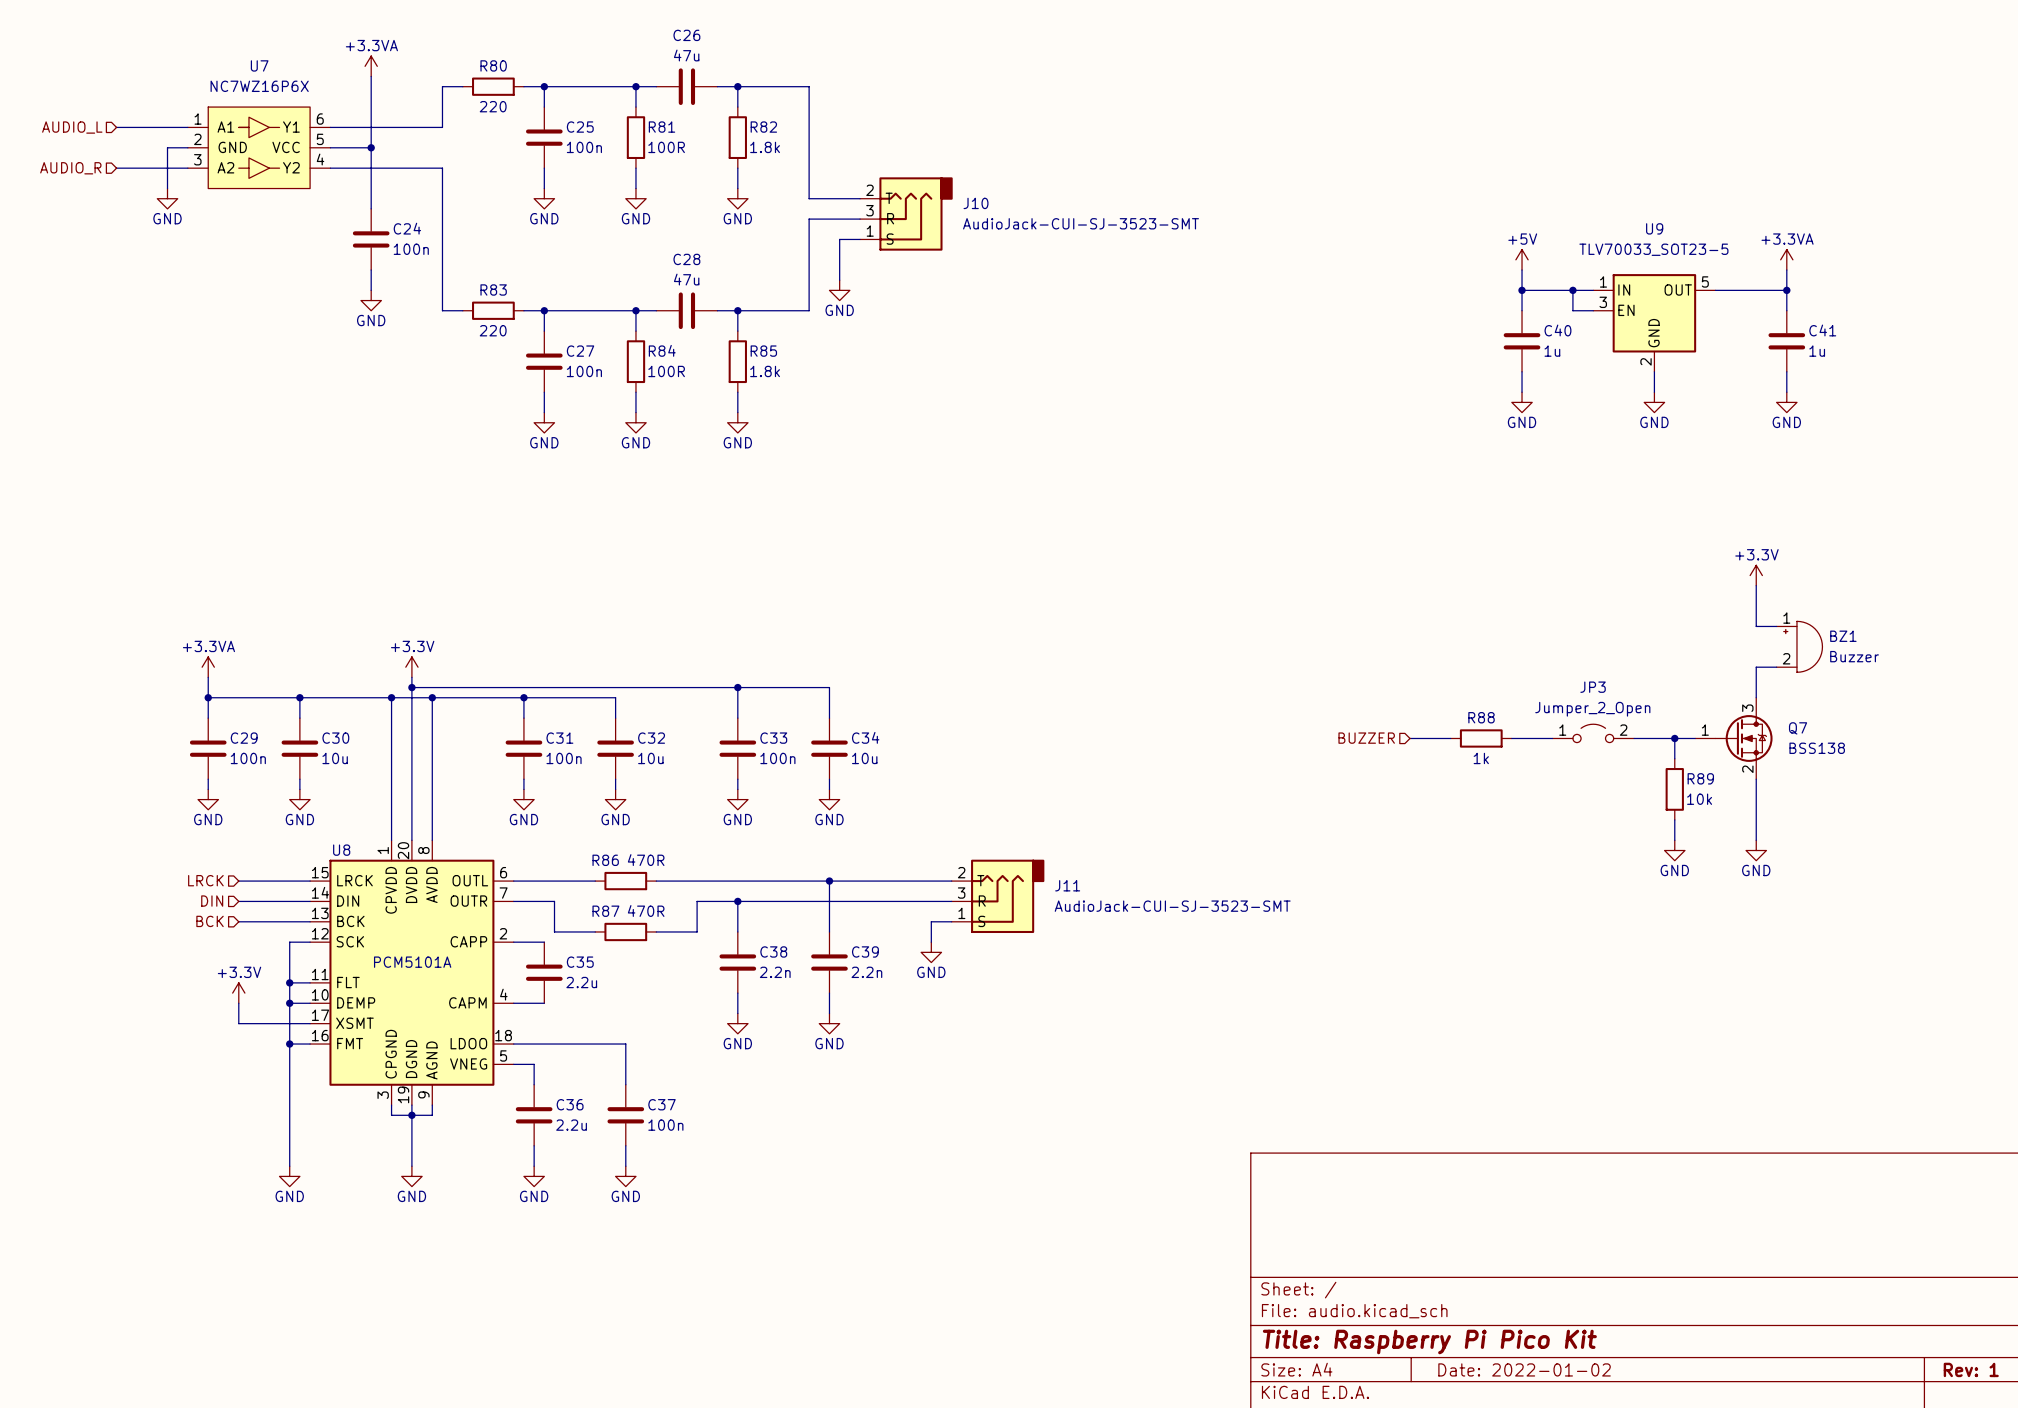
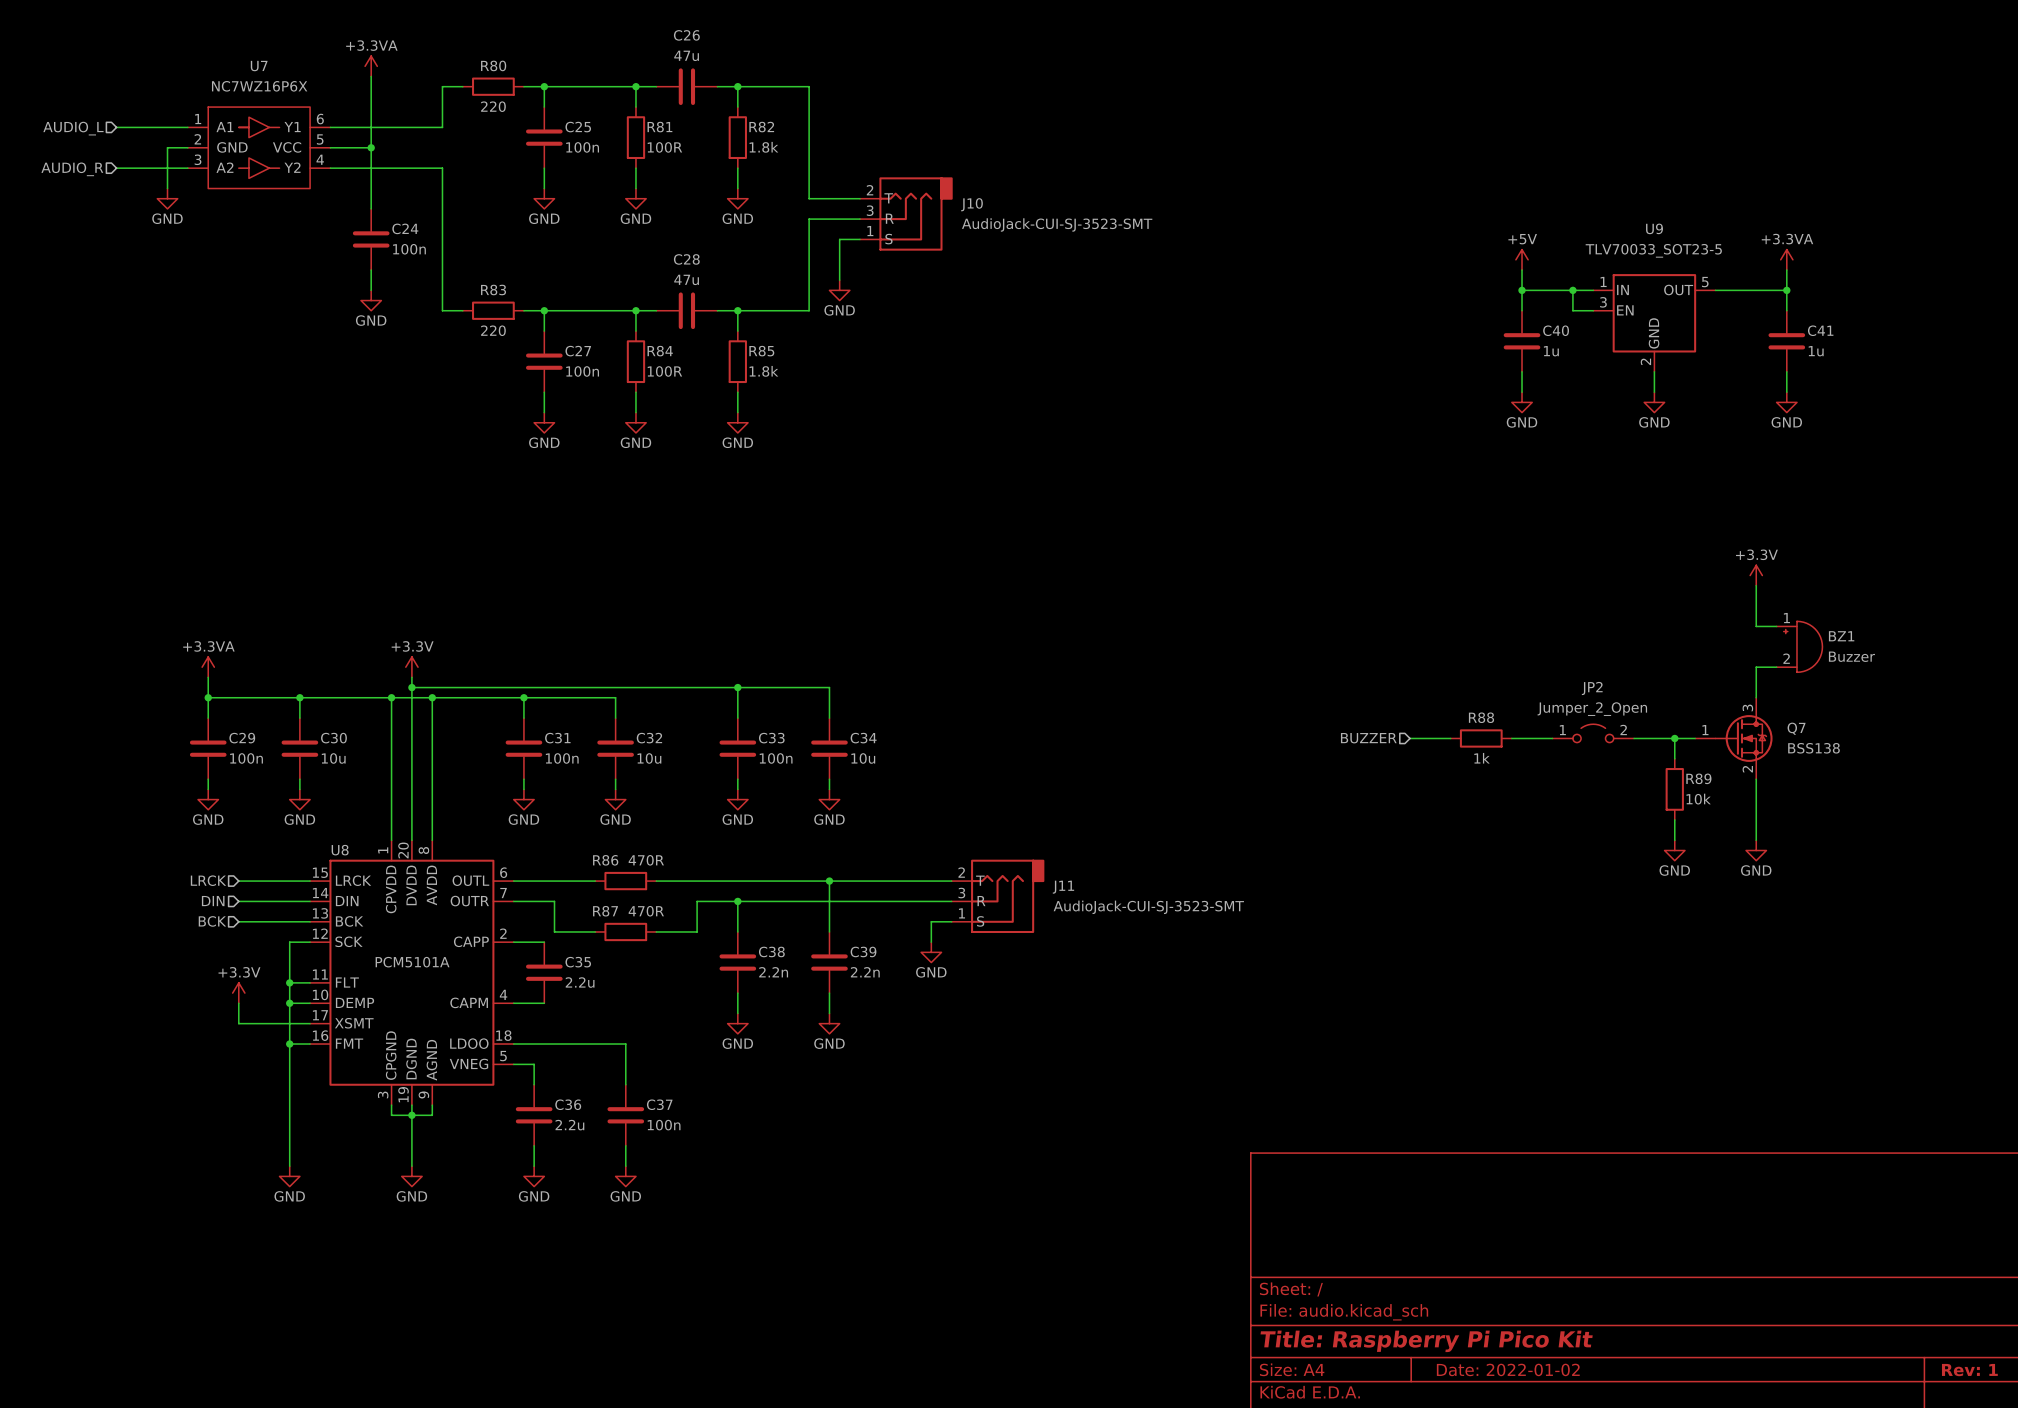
JP3 name: JP3 (1593, 687) -> JP2 (1592, 688)

